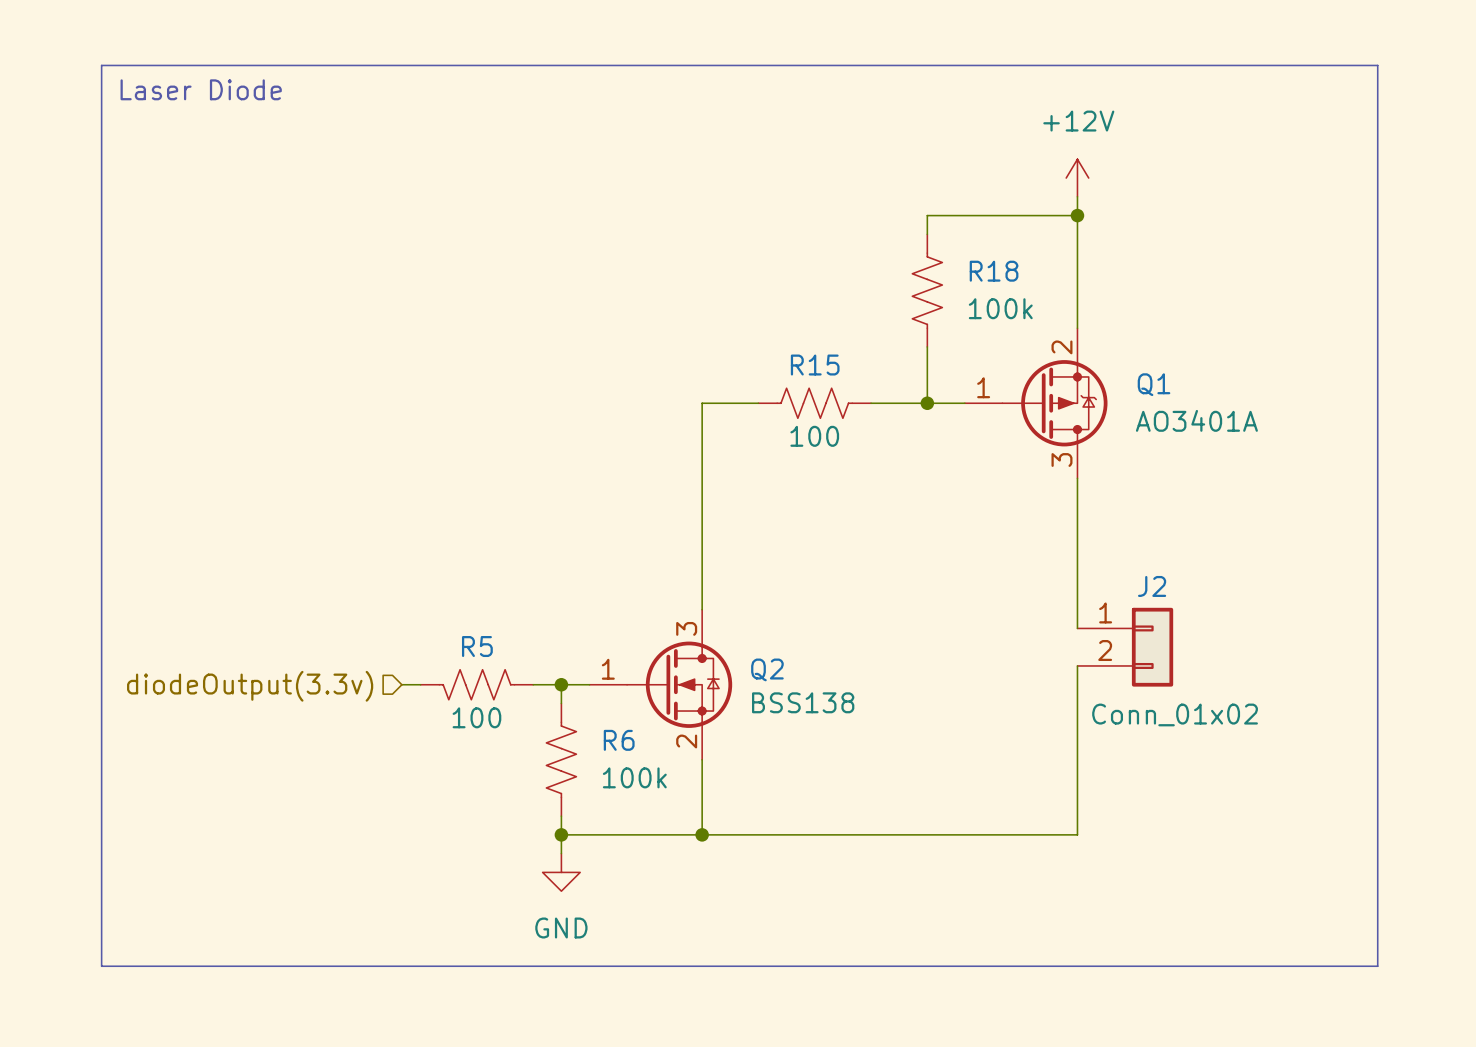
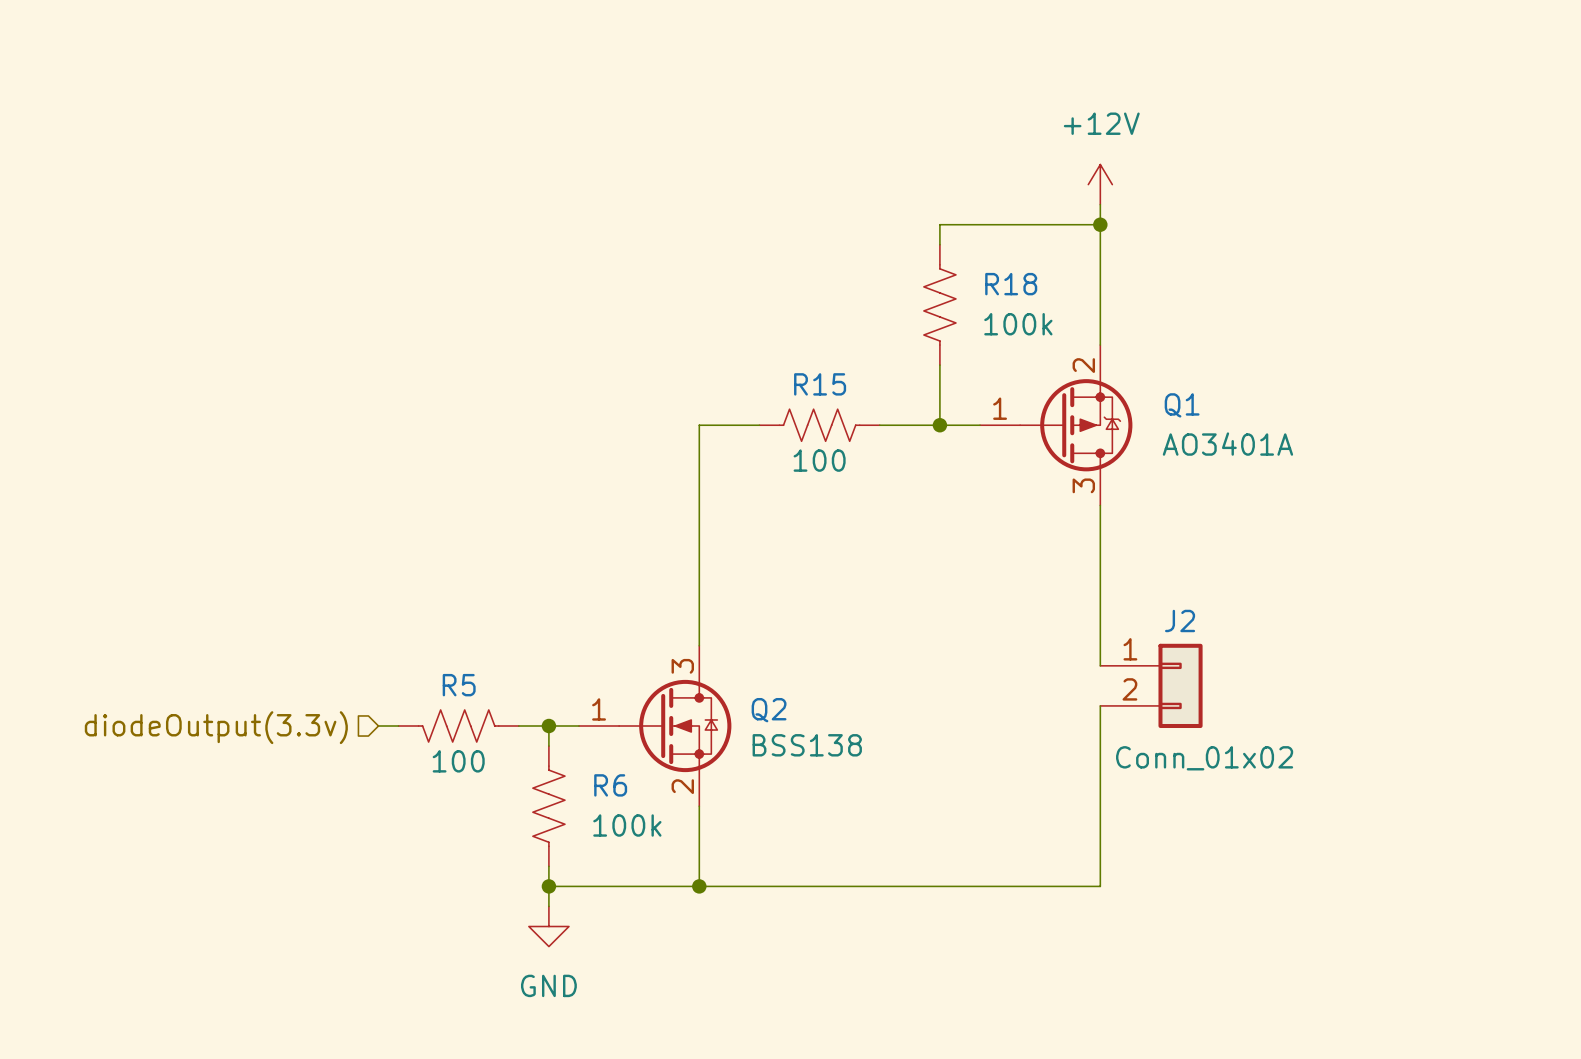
line: (101, 65) (1377, 65) (1377, 966) (101, 966) (101, 65) -> none
text: Laser Diode (201, 89) -> none

